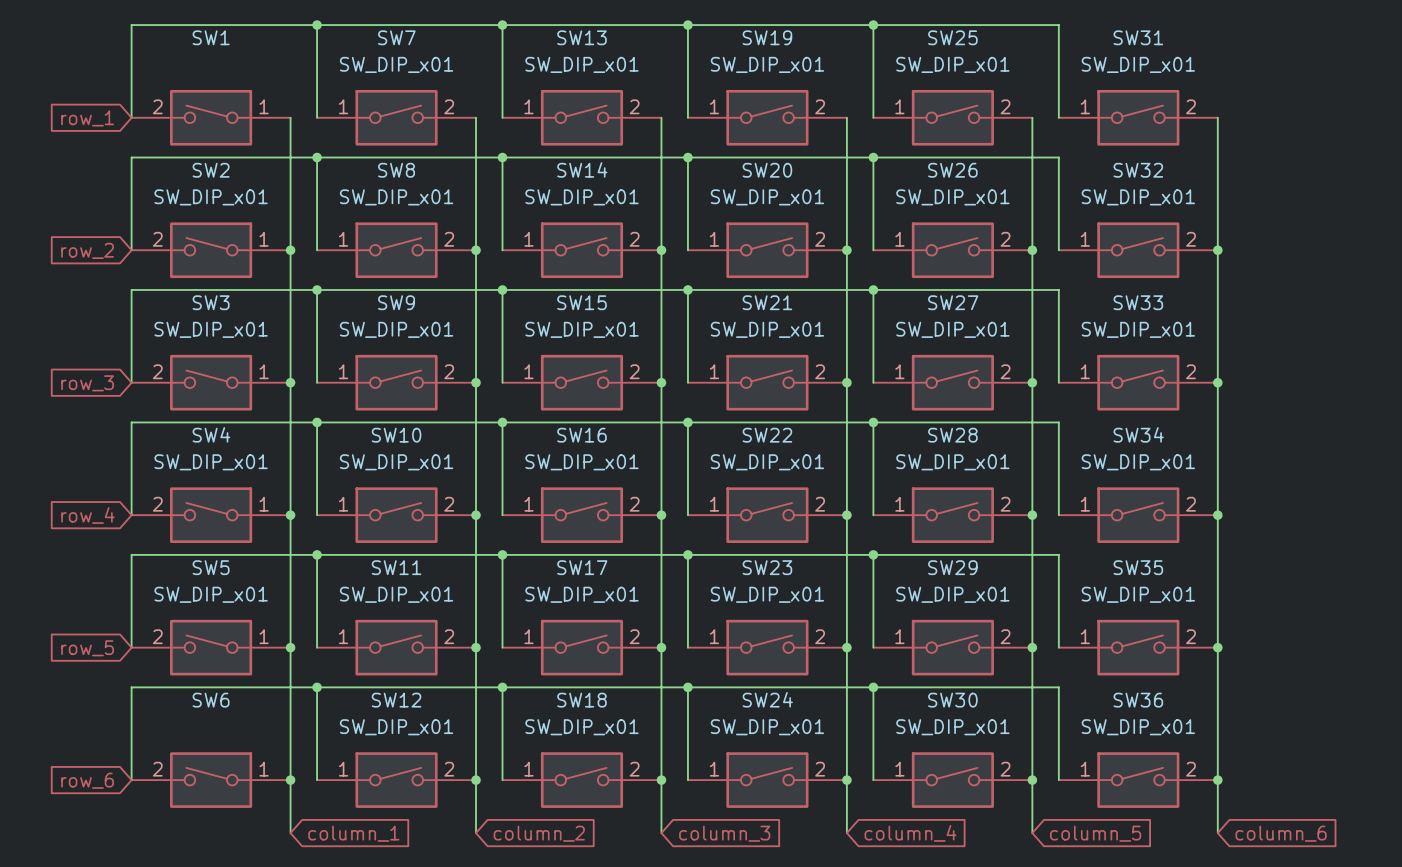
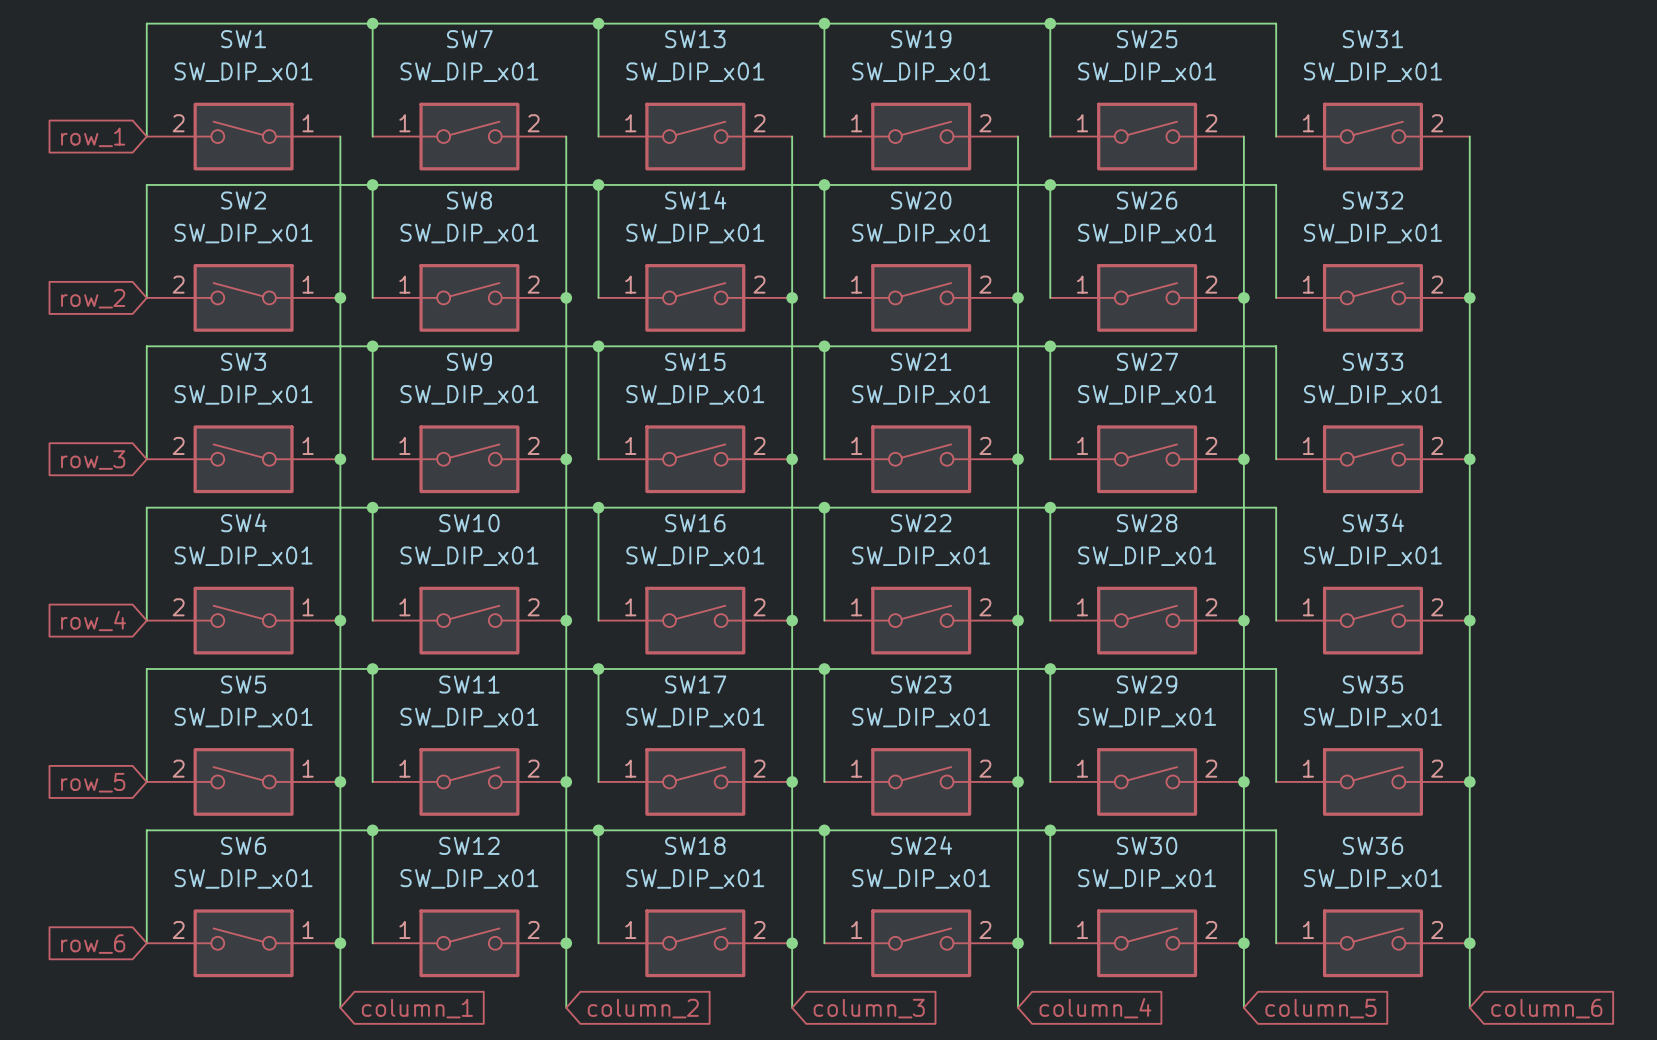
SW1 value: none -> SW_DIP_x01 (243, 72)
SW6 value: none -> SW_DIP_x01 (243, 878)

